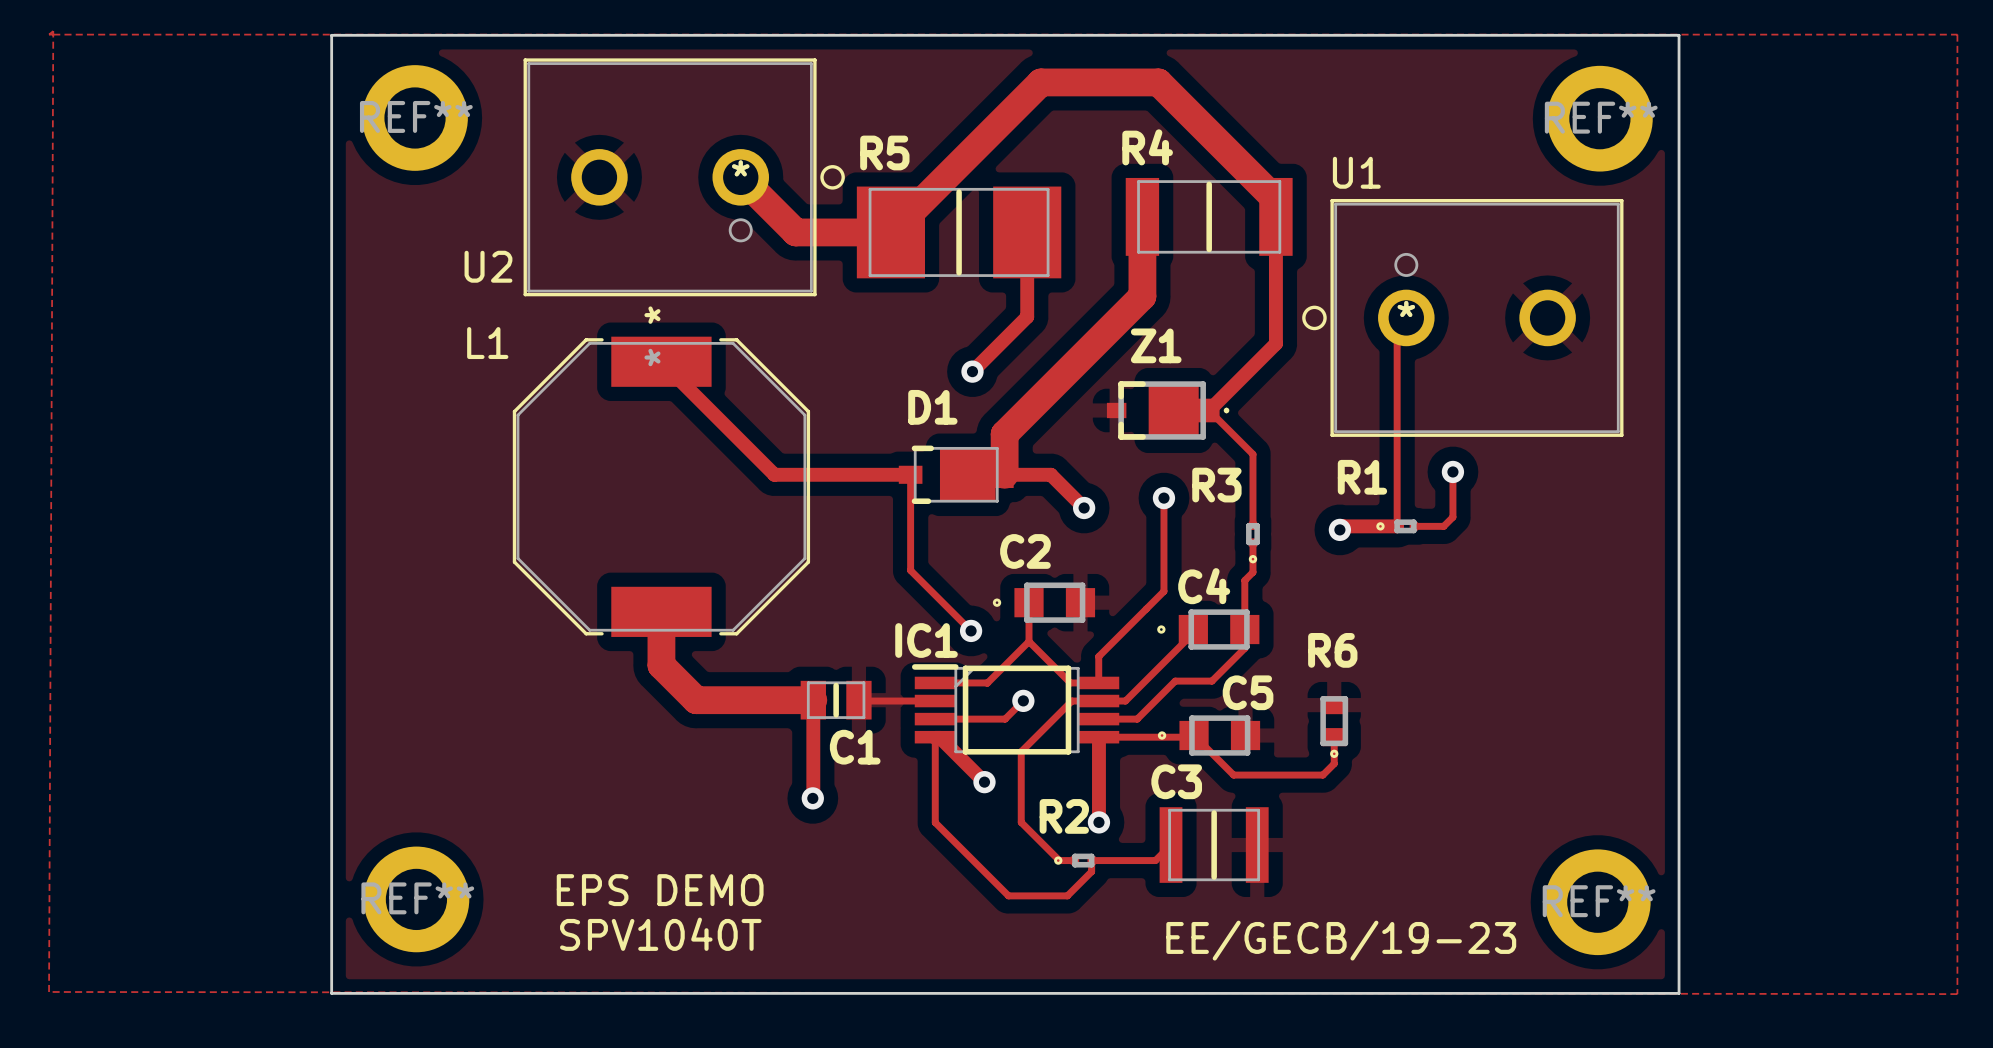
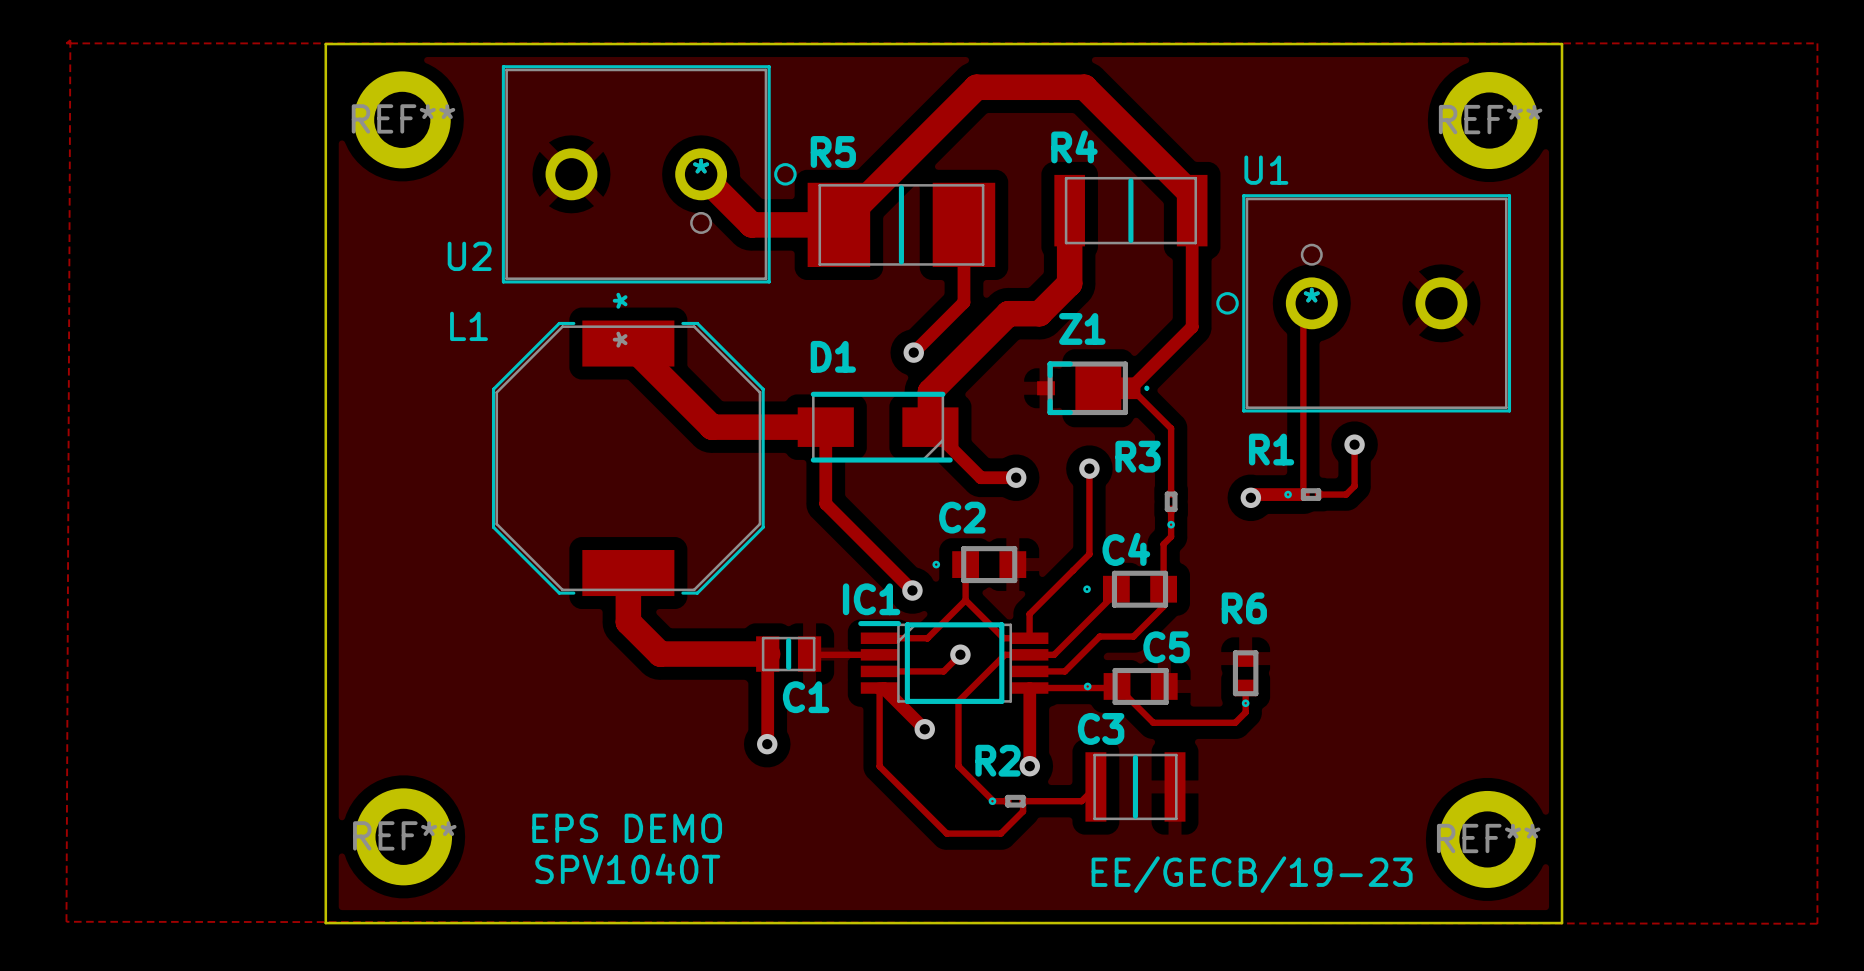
track: (1109, 329) (1004, 434) (1004, 474) -> (1039, 313) (1008, 313) (930, 391) (930, 427) (980, 477) (1016, 477)
track width: thin (661, 361) (752, 452) -> thick (628, 343) (711, 427)
D1 footprint: [898, 445, 1014, 505] -> [797, 391, 959, 463]
track: (752, 452) (774, 474) (910, 474) (910, 570) -> (711, 427) (825, 427) (825, 503) (856, 535)
track: (967, 474) (1050, 474) (1084, 508) -> none
track width: thin (910, 570) (971, 630) -> thick (856, 535) (912, 590)

